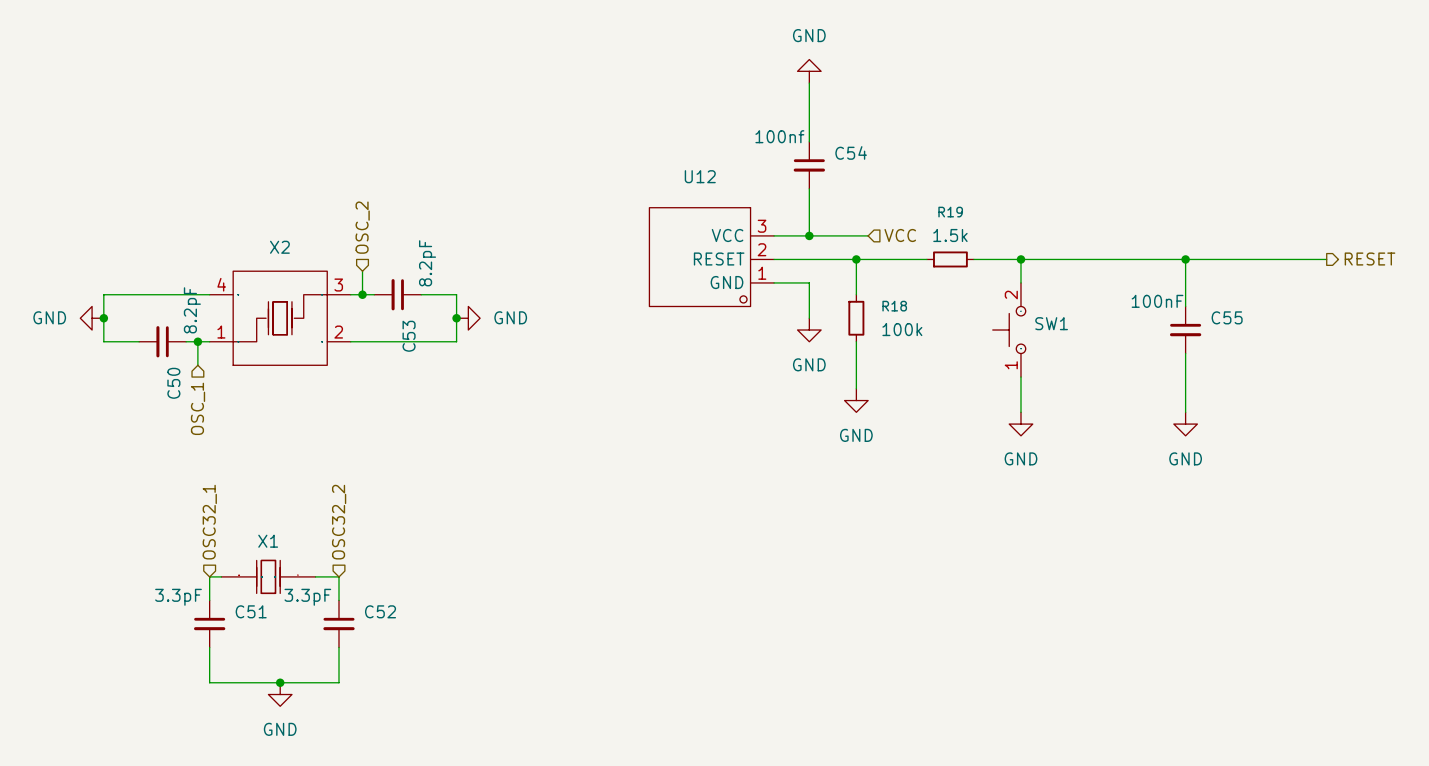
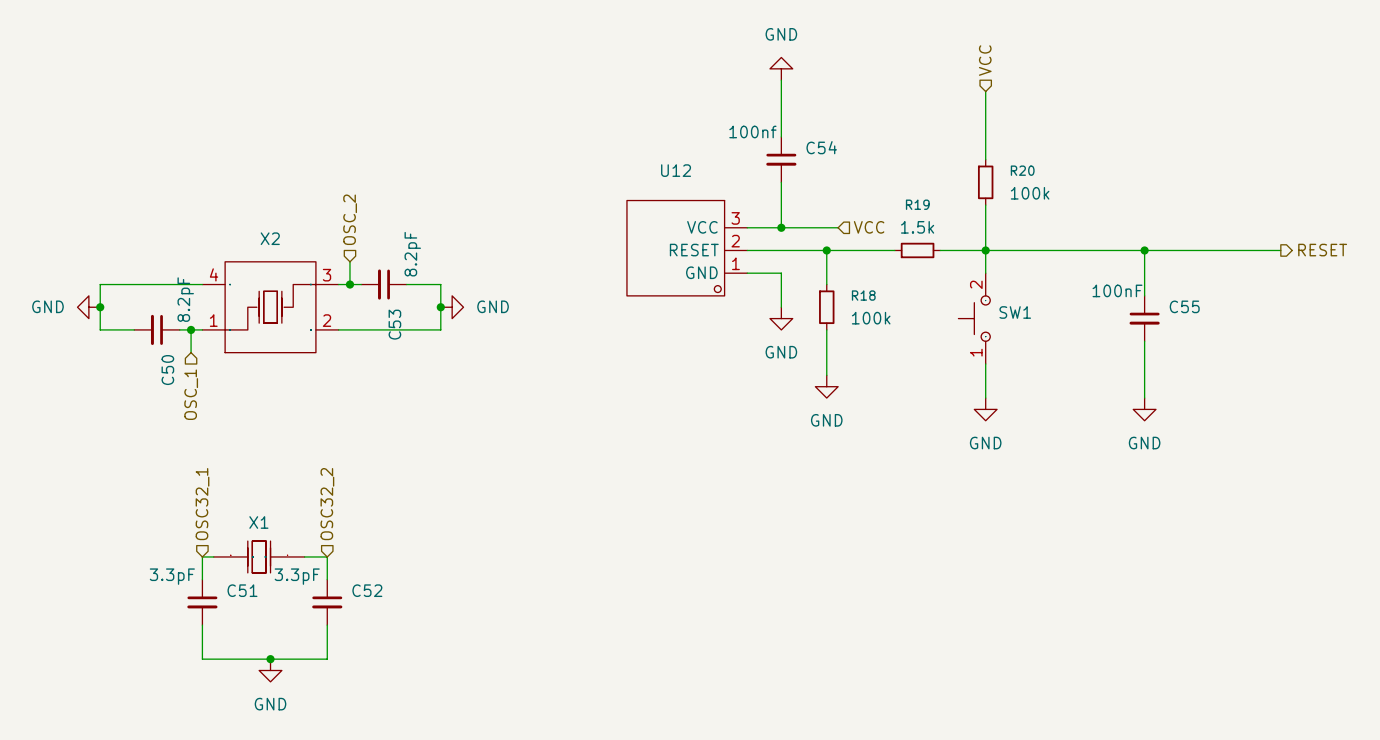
hierarchical label: none -> VCC (985, 60)
wire: none -> (985, 91) (985, 159)
R20: none -> 100k (985, 182)
wire: none -> (985, 205) (985, 250)

